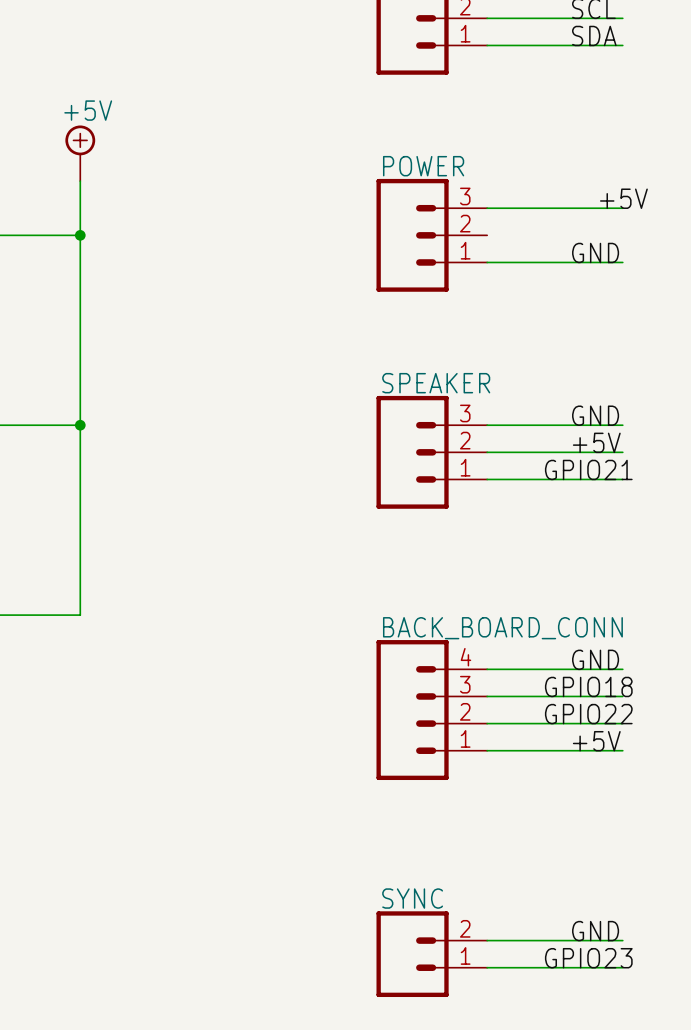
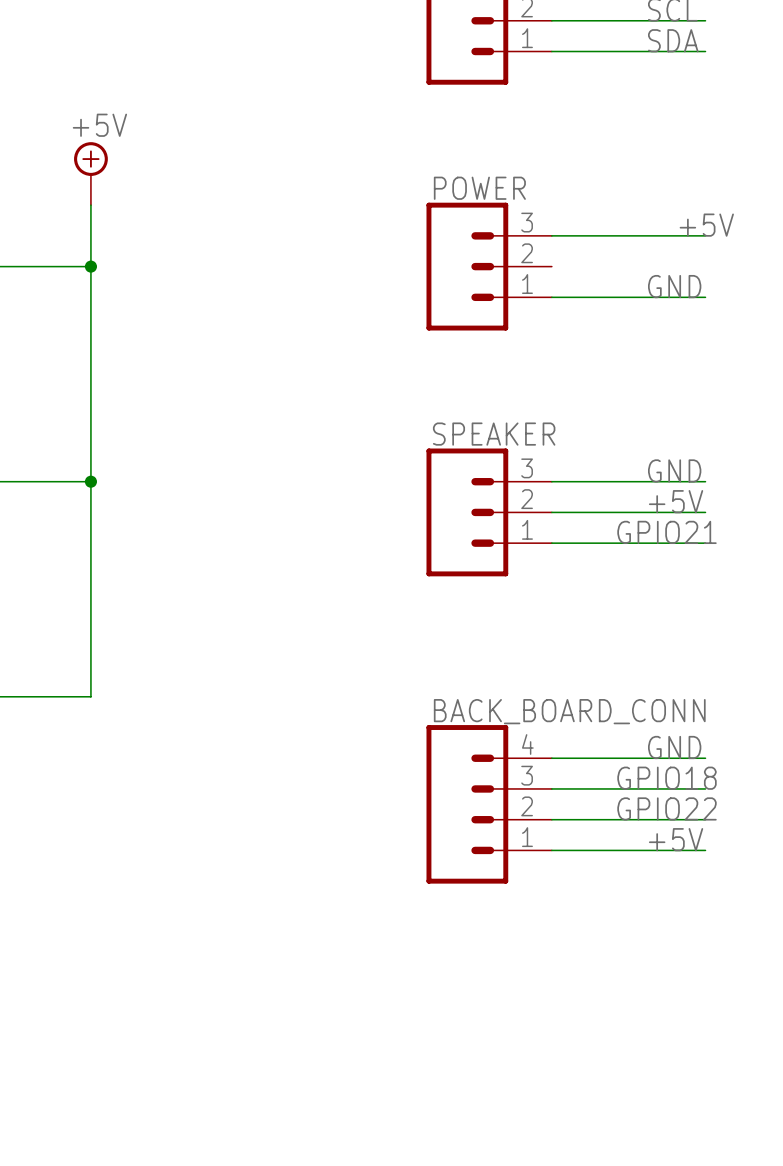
label: GND (595, 931) -> none
wire: (487, 940) (622, 940) -> none
SYNC: (431, 954) -> none
label: GPIO23 (588, 958) -> none
wire: (487, 967) (622, 967) -> none

